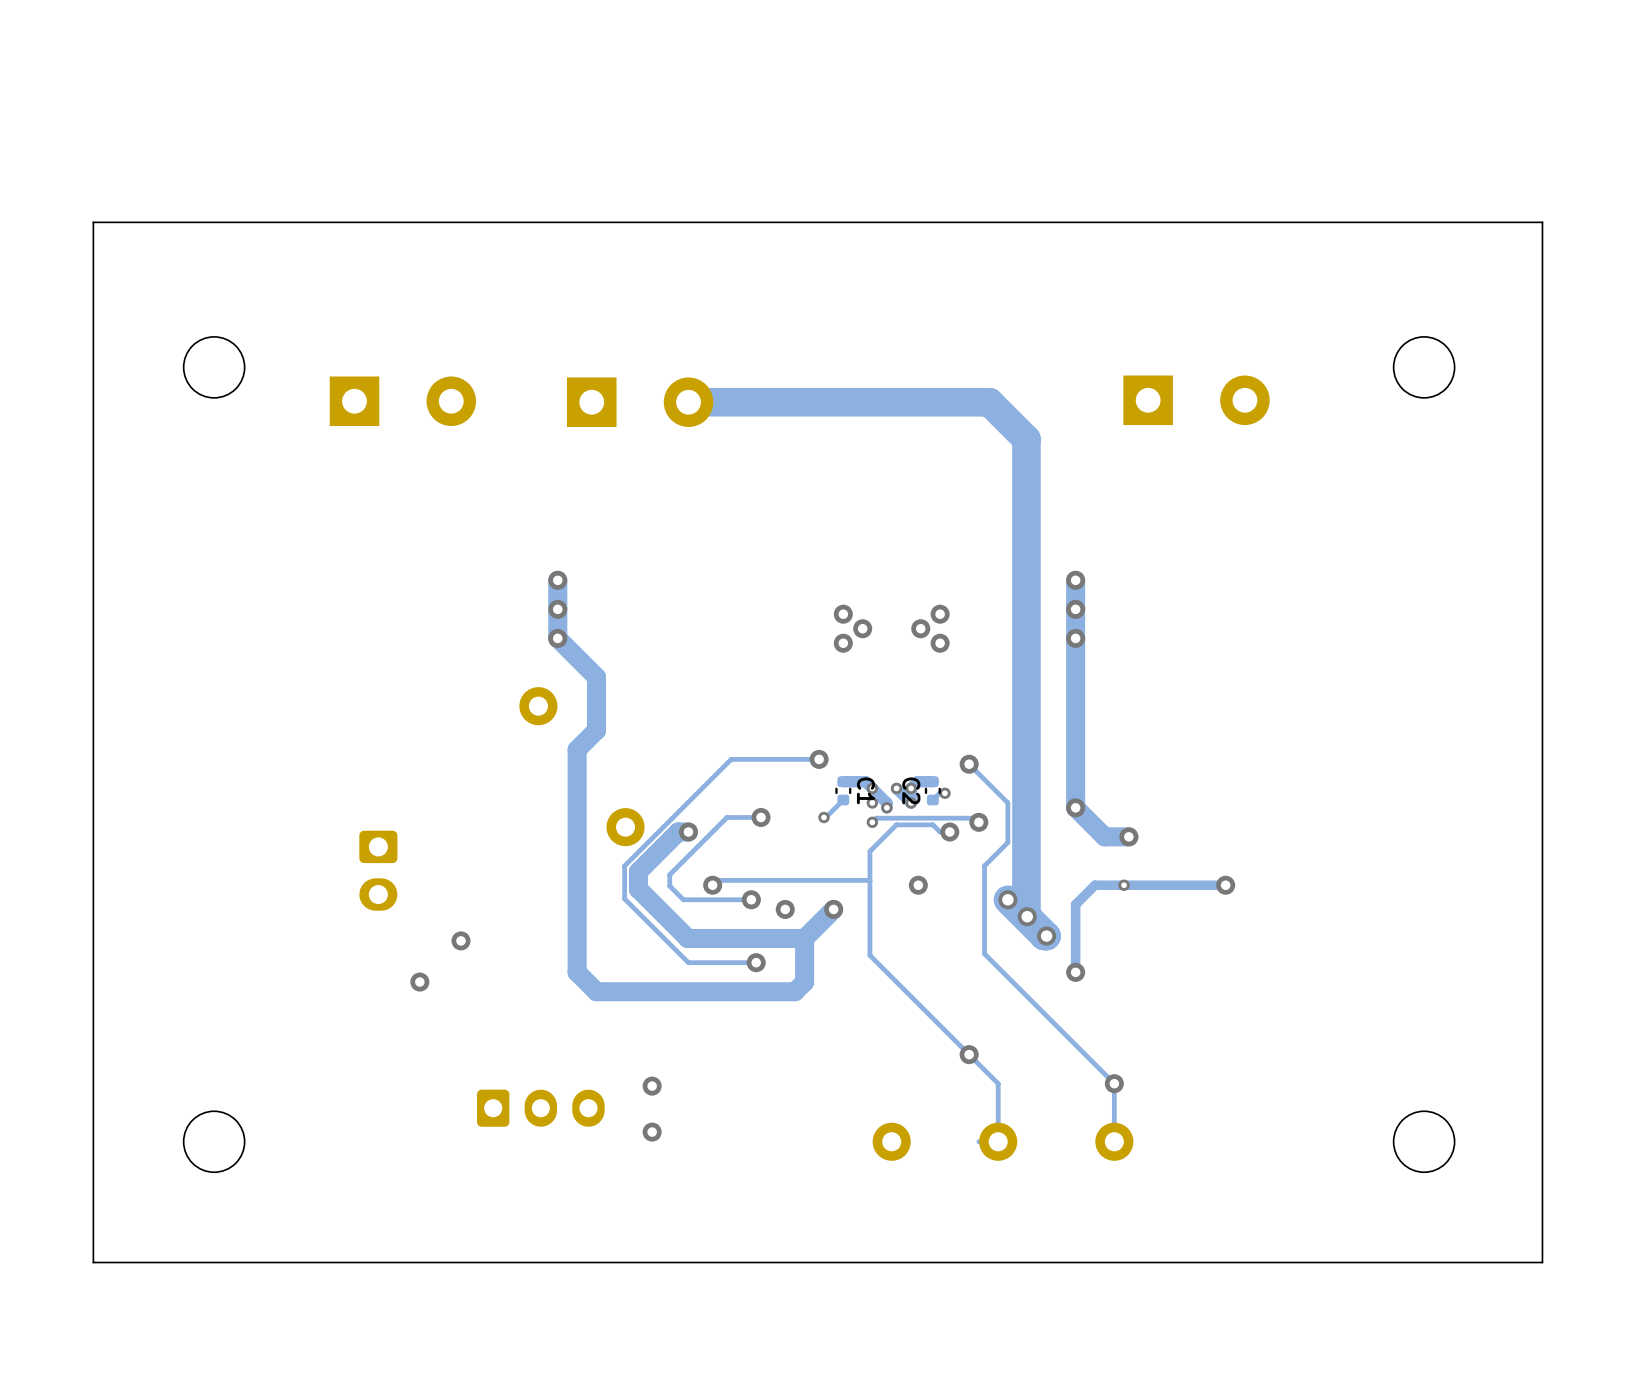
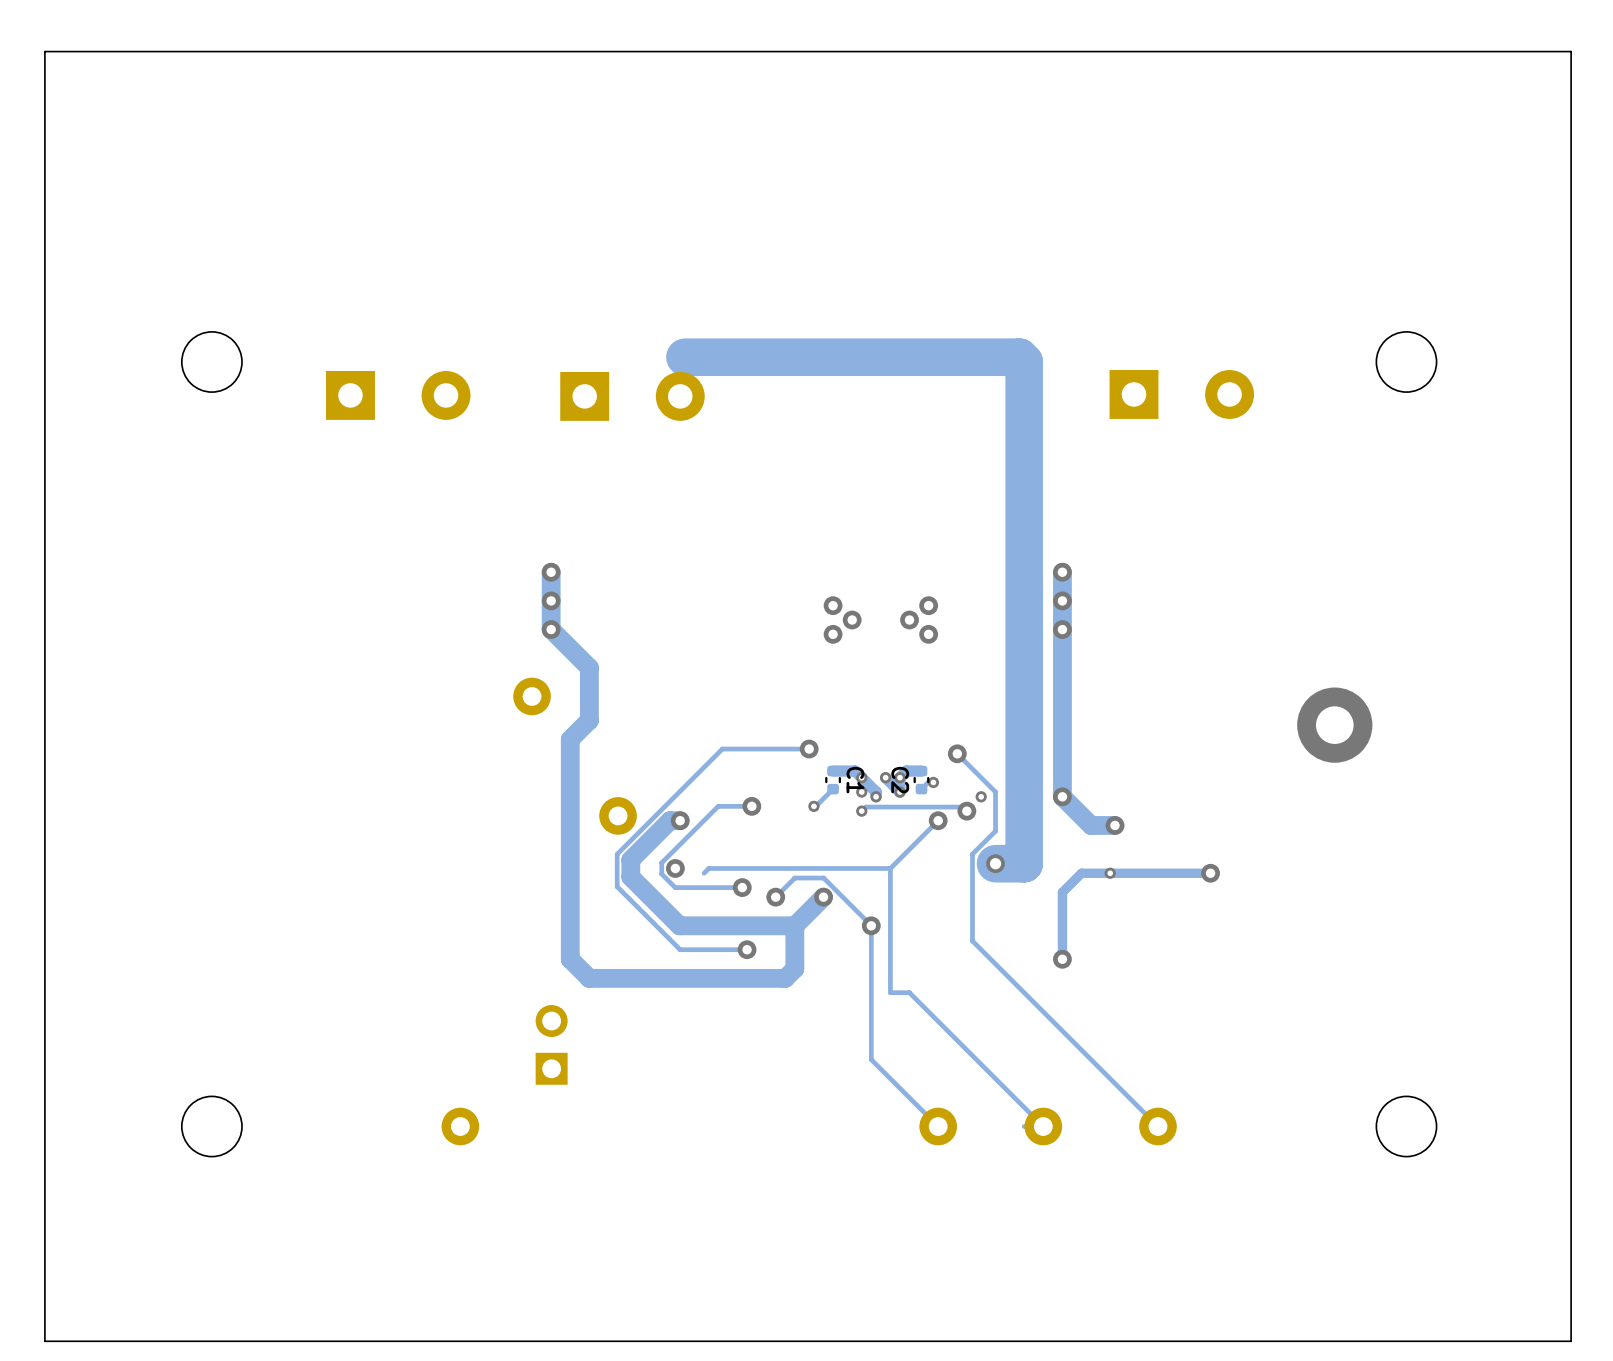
board edge: (1542, 222) (93, 222) (93, 1262) (1542, 1262) (1542, 222) -> (1571, 51) (1571, 1341) (44, 1341) (44, 51) (1571, 51)
track: none -> (684, 357) (1019, 357) (1024, 361) (1024, 863) (995, 863)
track: (688, 402) (989, 402) (1026, 439) (1026, 915) (1046, 936) (1044, 936) (1007, 899) -> none
via: none -> (1334, 725)
via: none -> (981, 796)
track: (949, 832) (940, 832) (932, 824) (896, 824) (869, 851) (869, 955) (920, 1006) -> (890, 868) (890, 992) (909, 992)
track: none -> (938, 820) (890, 868)
part: (378, 870) -> none
via: none -> (995, 863)
track: none -> (890, 868) (859, 868)
via position: (712, 885) -> (675, 868)
via position: (918, 885) -> (871, 925)
via: (1007, 899) -> none
track: none -> (775, 897) (794, 878) (823, 878) (871, 925) (871, 1059) (938, 1126)
via: (1027, 916) -> none
via: (1046, 936) -> none
via: (460, 940) -> none
via: (419, 982) -> none
via: (969, 1054) -> none
part: none -> (551, 1044)
track: (998, 1083) (998, 1141) (978, 1141) -> (985, 1069) (1043, 1126) (1024, 1126)
track: (1114, 1083) (1114, 1141) -> (1100, 1069) (1158, 1126)
via: (1114, 1083) -> none
via: (652, 1086) -> none
part: (540, 1108) -> none
via: (652, 1132) -> none
part: none -> (460, 1126)
part: (891, 1141) -> none
part: none -> (938, 1126)
part: (998, 1141) -> none
part: none -> (1043, 1126)
part: (1114, 1141) -> none
part: none -> (1158, 1126)

